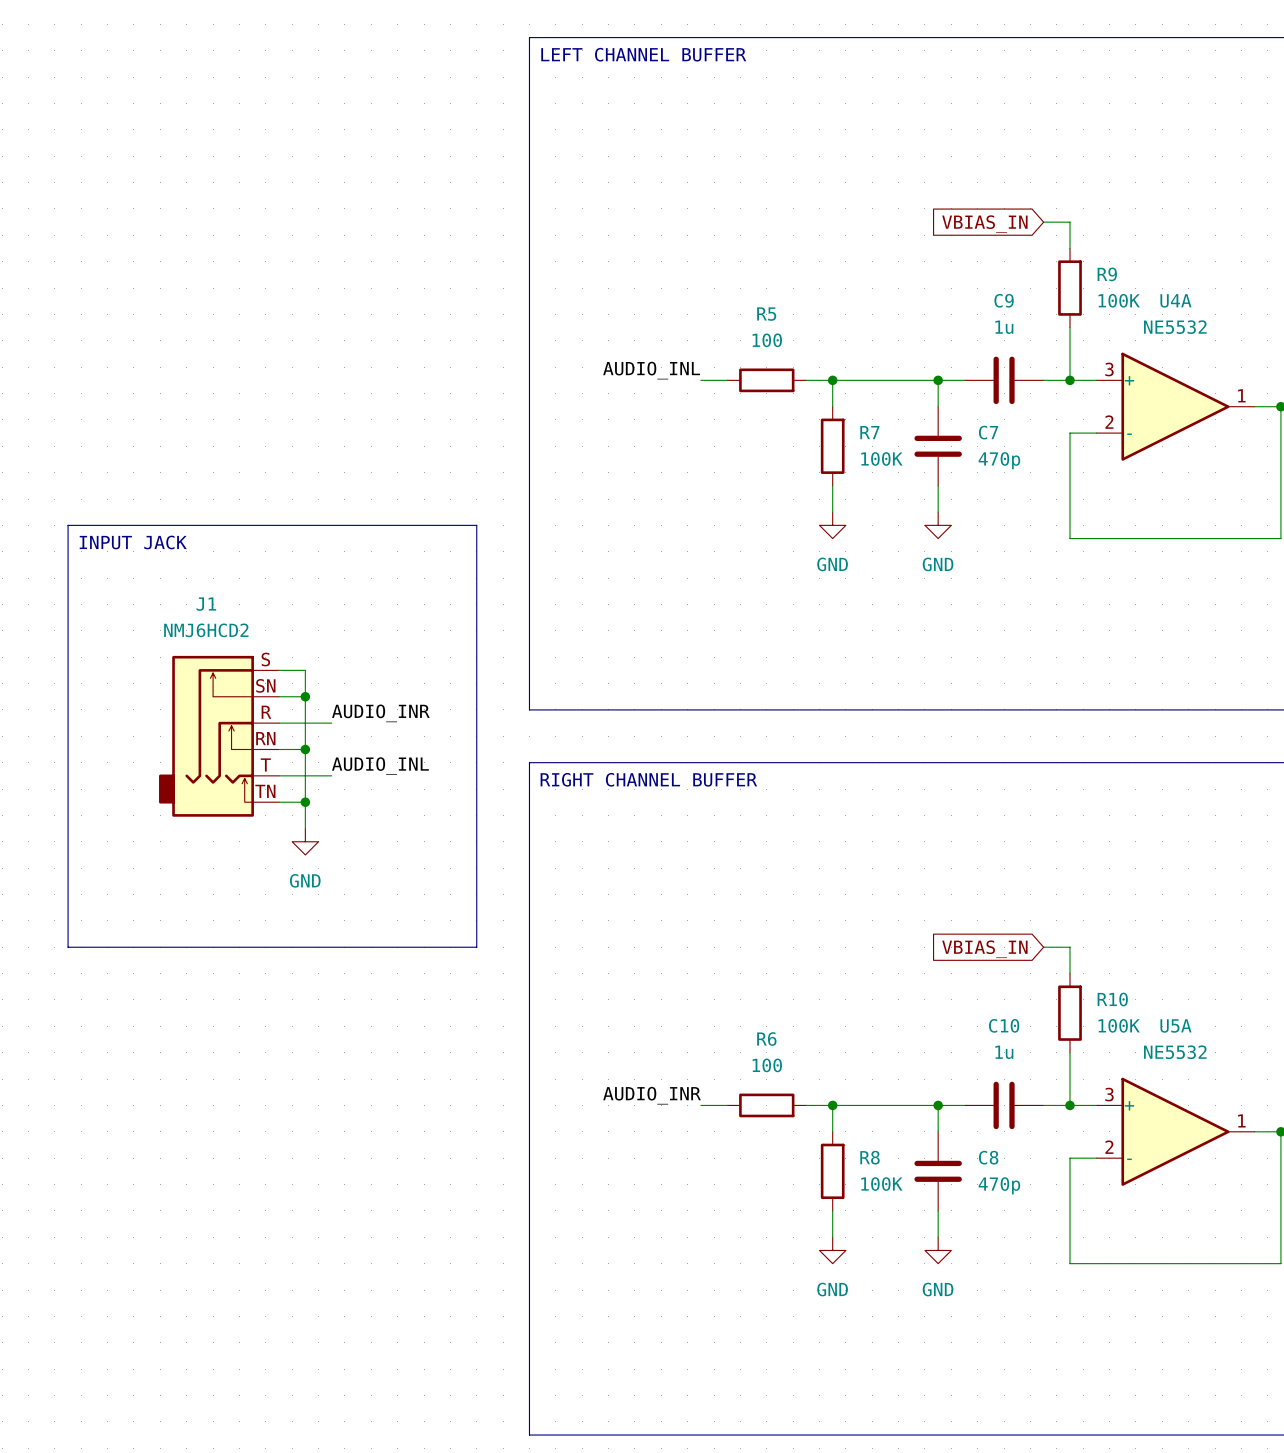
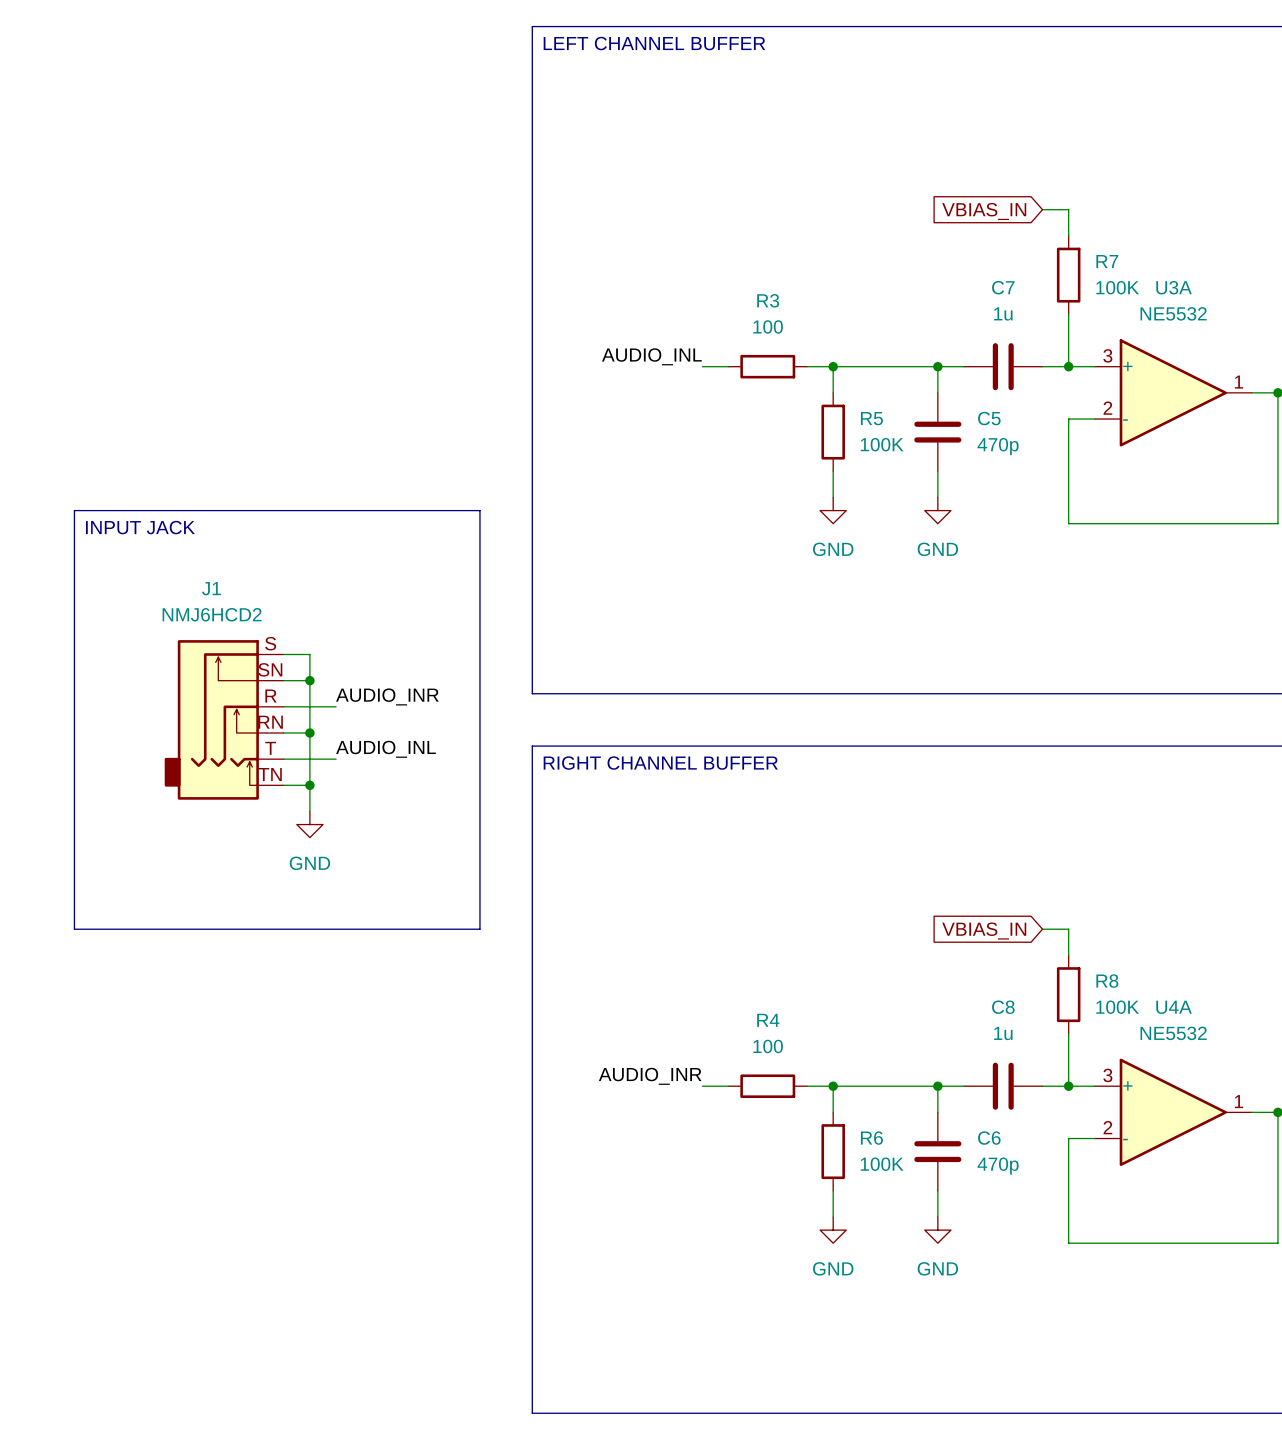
R9 name: R9 (1107, 274) -> R7 (1107, 261)
C9 name: C9 (1004, 300) -> C7 (1003, 287)
U4A name: U4A (1175, 300) -> U3A (1174, 287)
R5 name: R5 (766, 314) -> R3 (768, 300)
R7 name: R7 (869, 432) -> R5 (871, 418)
C7 name: C7 (988, 432) -> C5 (989, 418)
R10 name: R10 (1112, 999) -> R8 (1107, 981)
C10 name: C10 (1004, 1025) -> C8 (1003, 1007)
U5A name: U5A (1175, 1025) -> U4A (1174, 1007)
R6 name: R6 (766, 1039) -> R4 (768, 1020)
R8 name: R8 (870, 1157) -> R6 (871, 1138)
C8 name: C8 (988, 1157) -> C6 (989, 1138)

